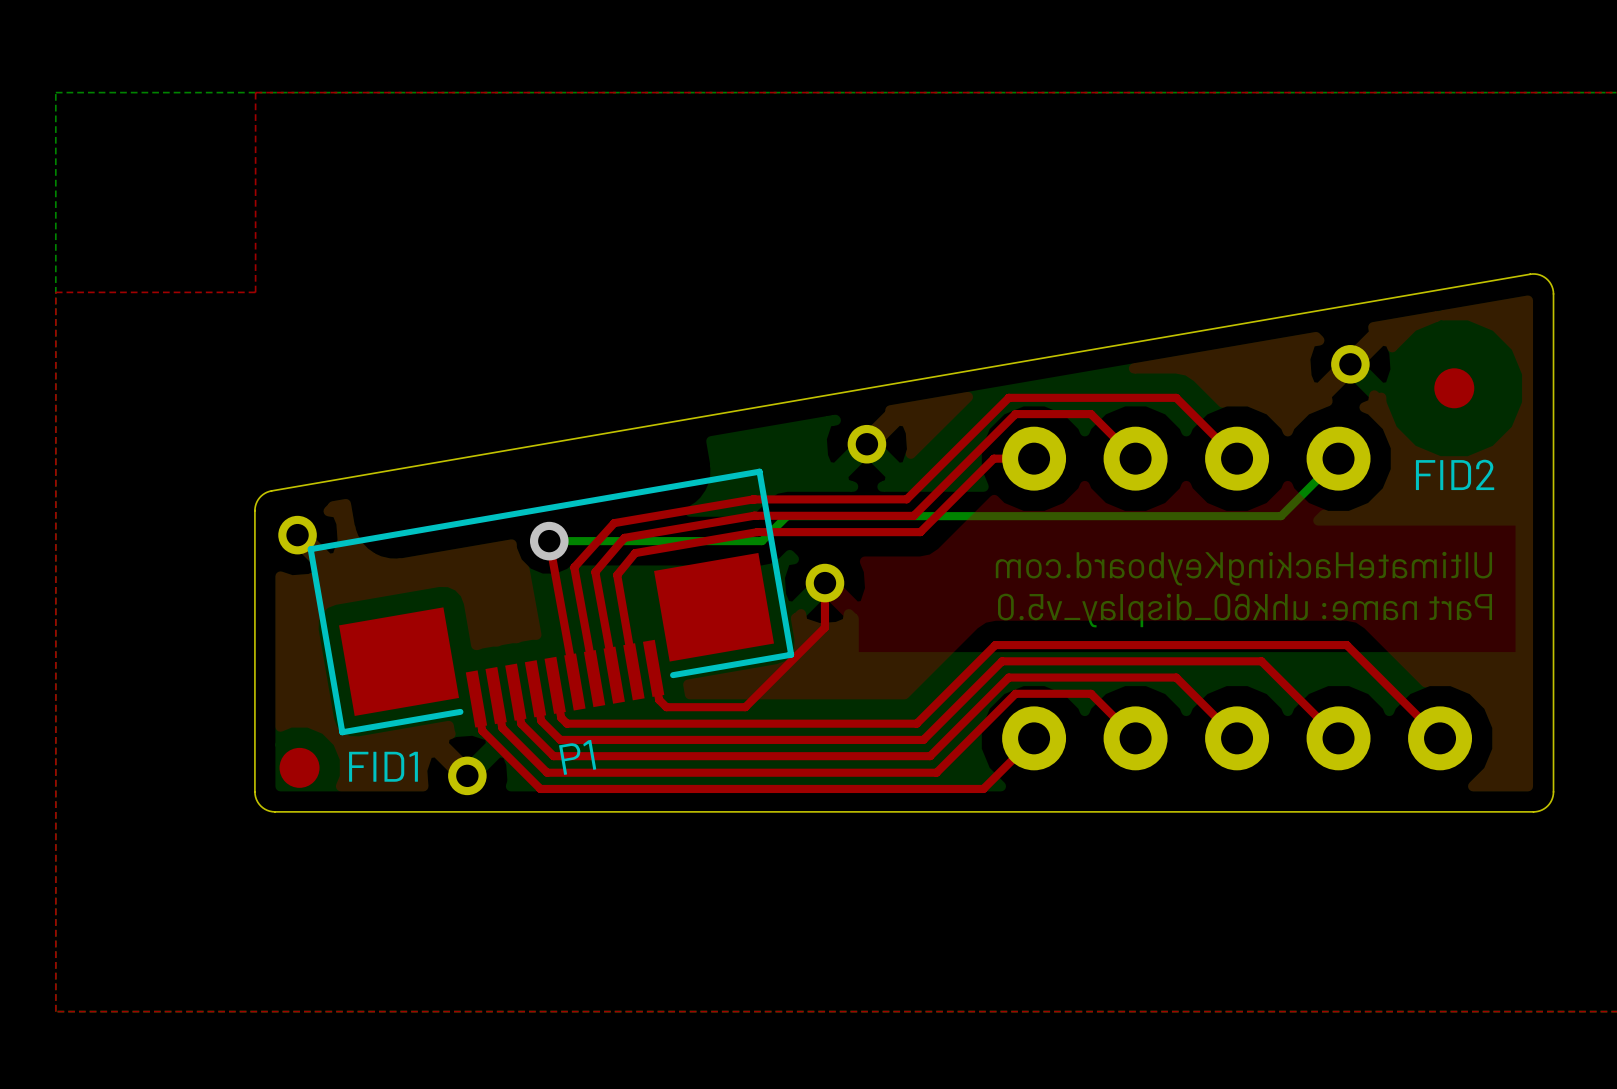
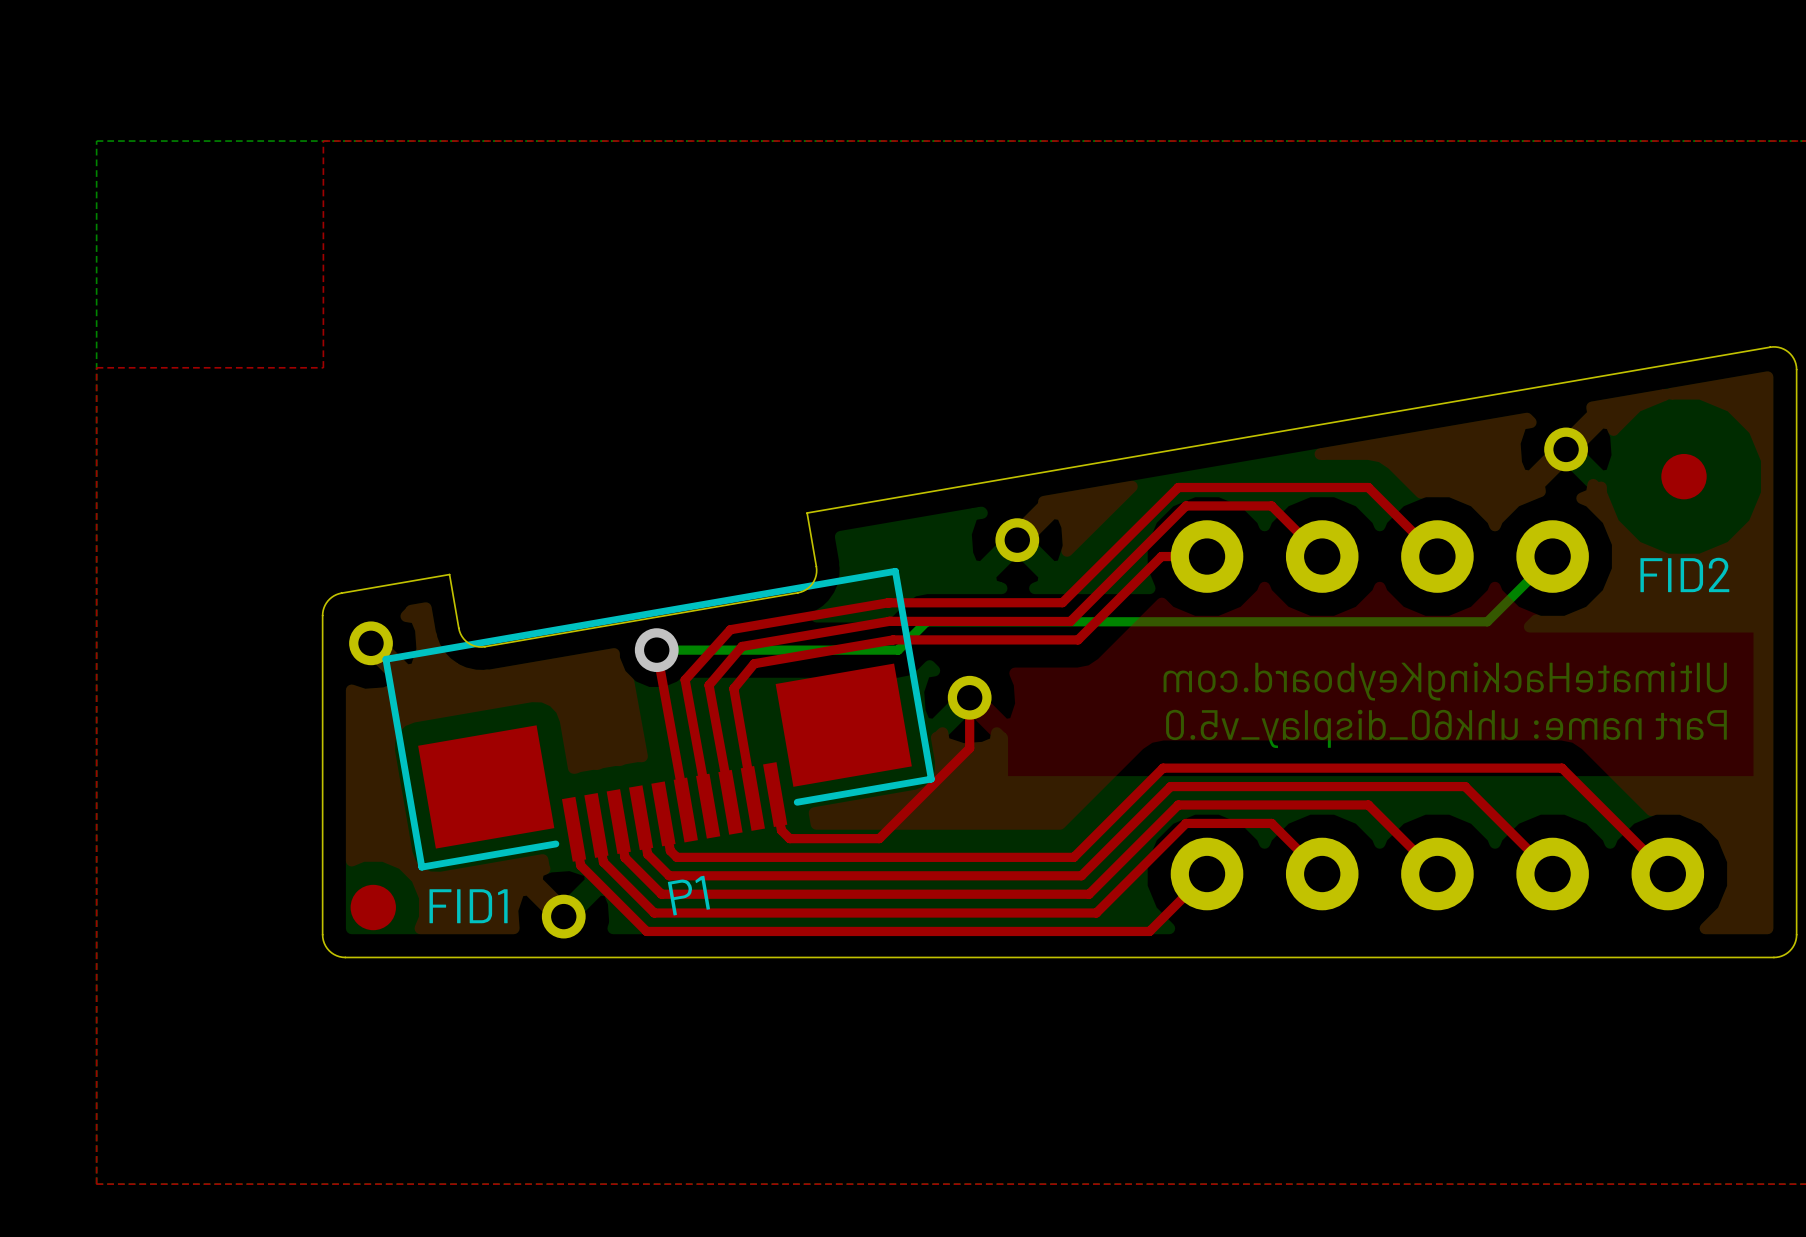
board edge: (681, 420) (366, 474) -> (807, 513) (816, 572) (812, 583) (803, 591) (485, 646) (470, 644) (460, 633) (449, 574)

